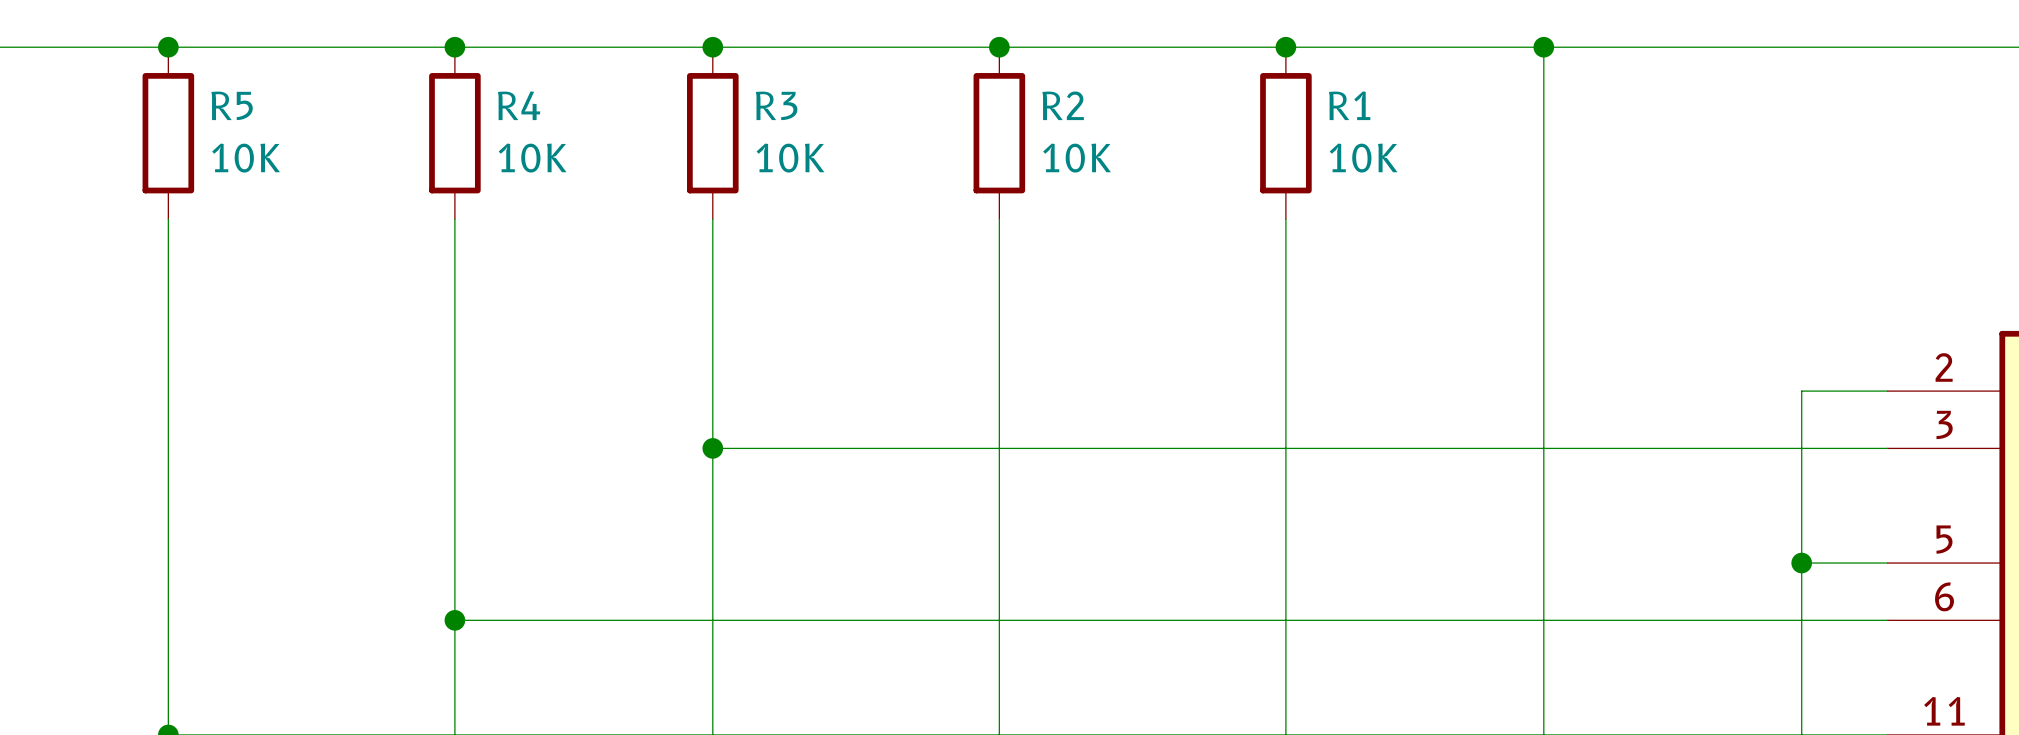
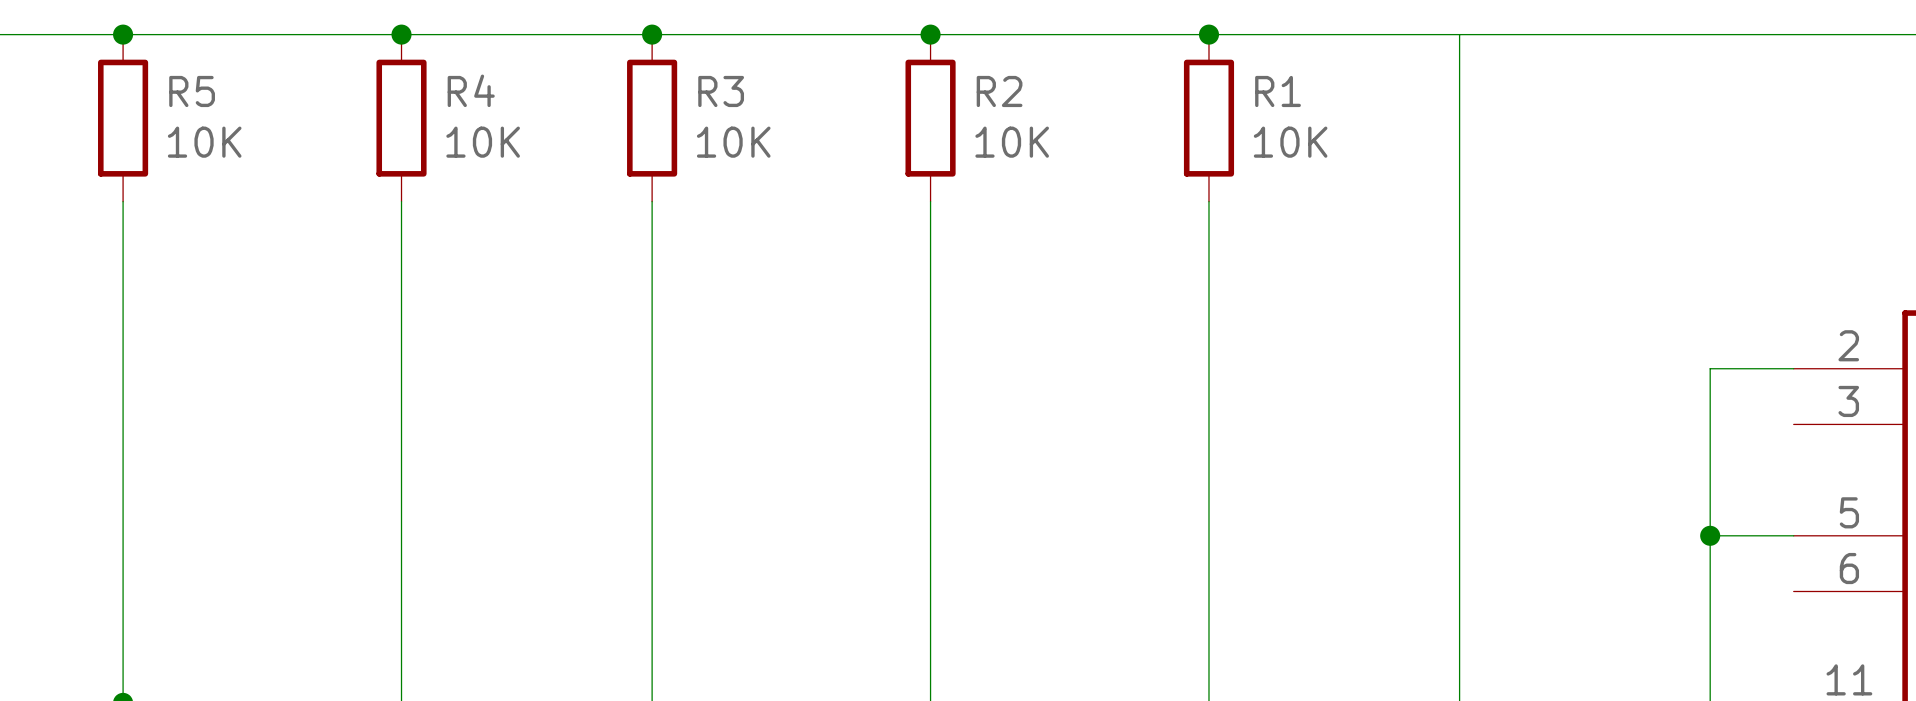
junction: (1543, 47) -> none
wire: (712, 448) (1887, 448) -> none
junction: (712, 448) -> none
wire: (454, 620) (1887, 620) -> none
junction: (454, 620) -> none

